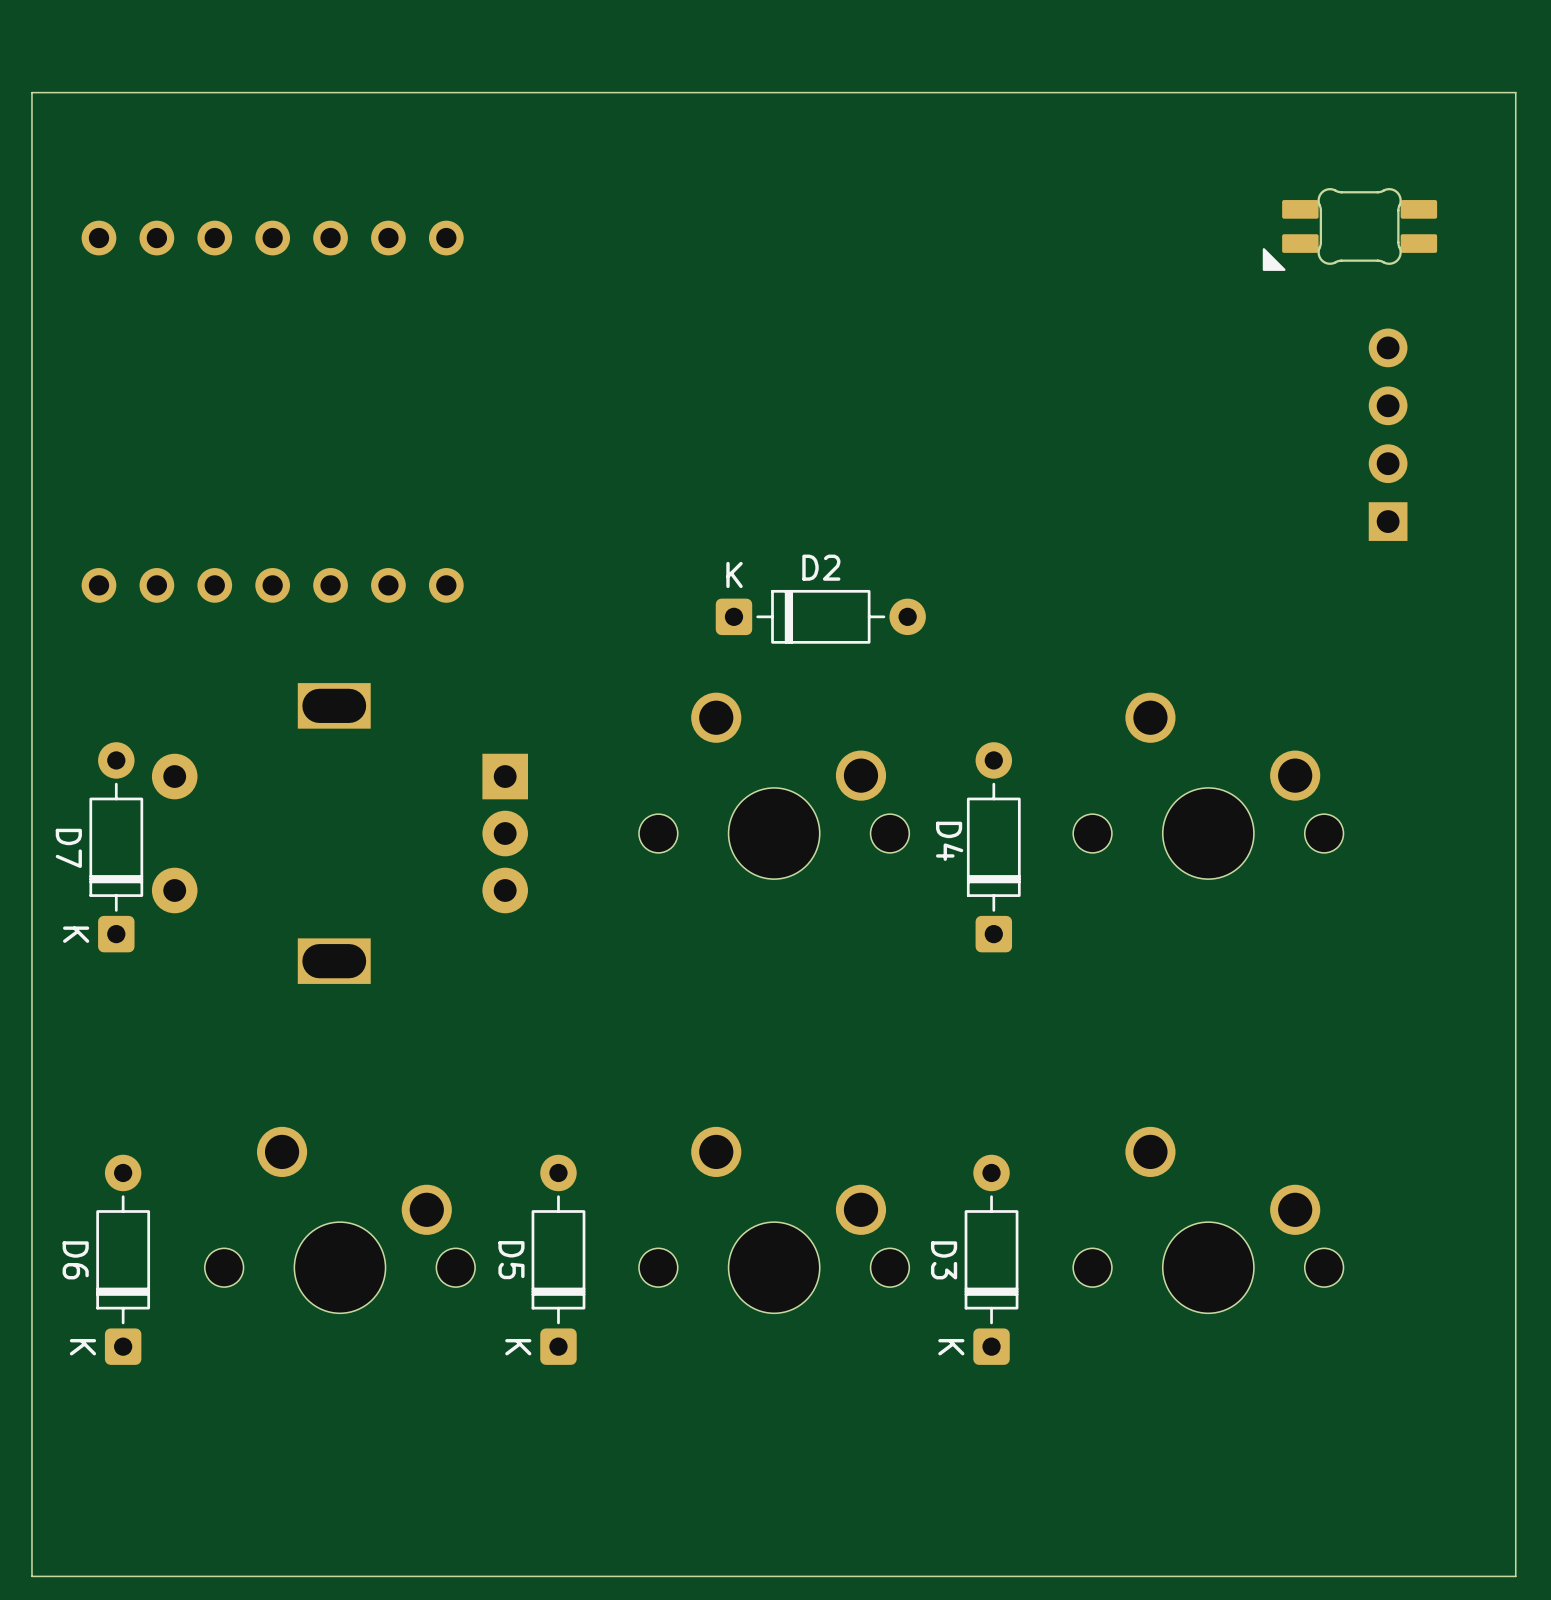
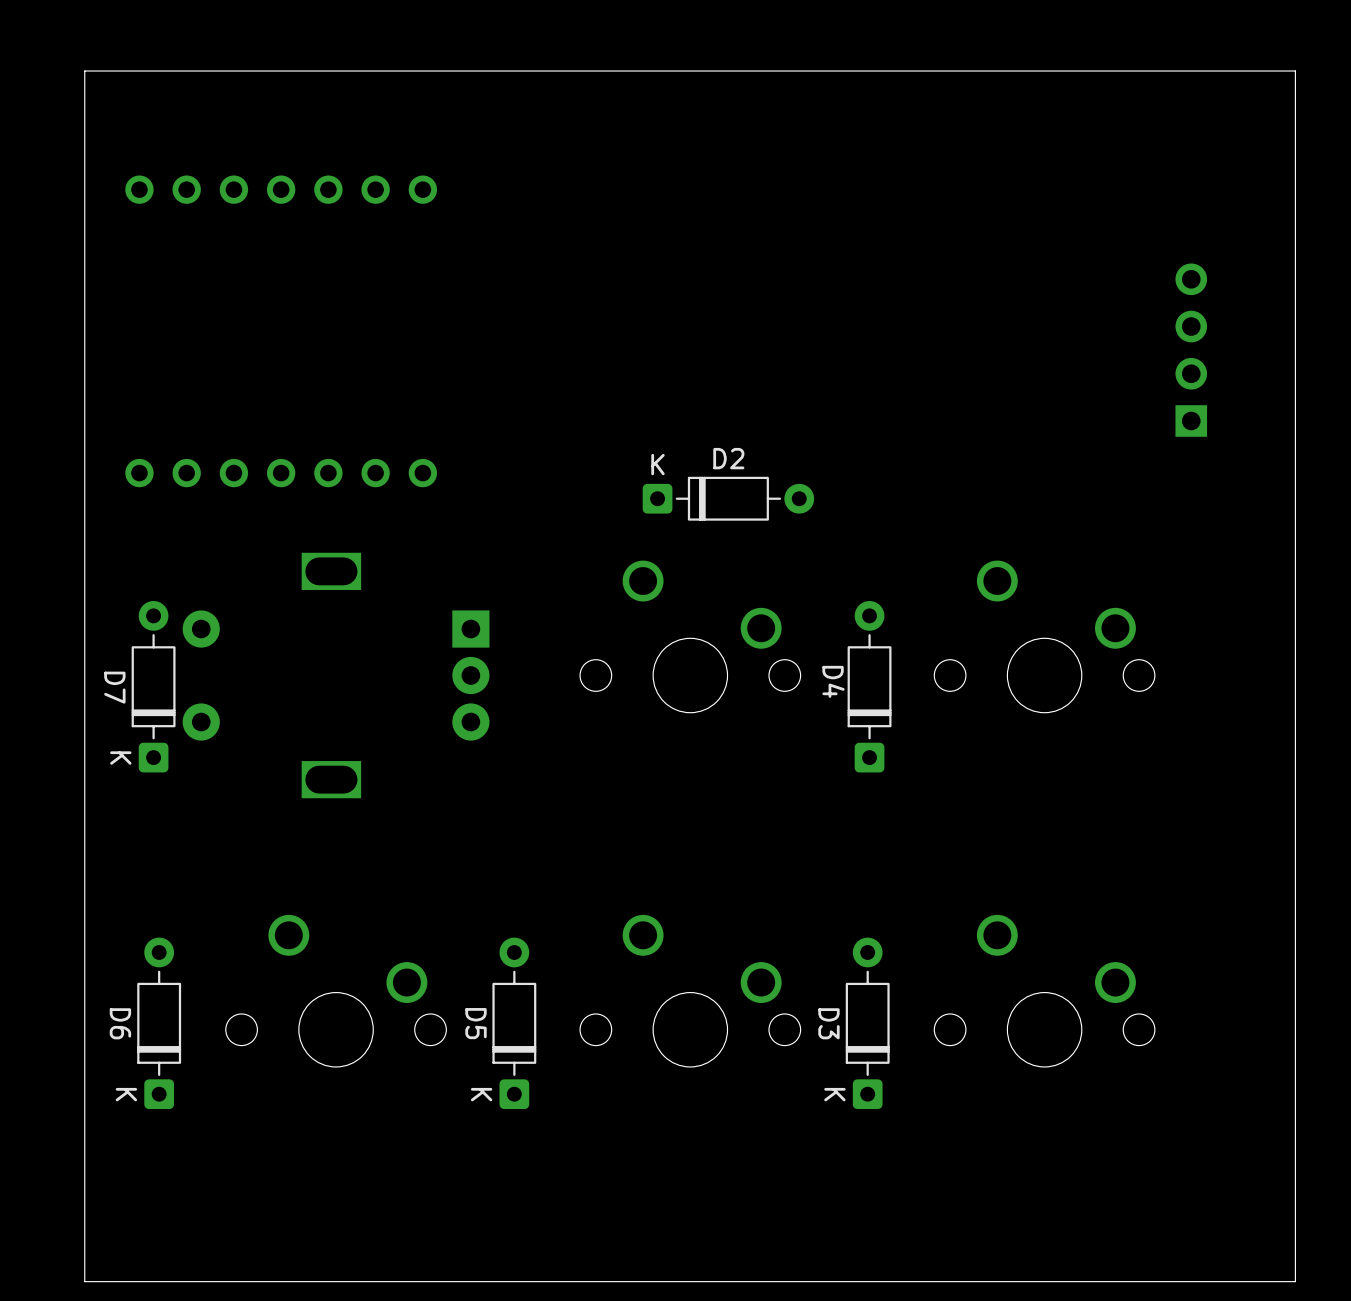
part: (1349, 229) -> none

